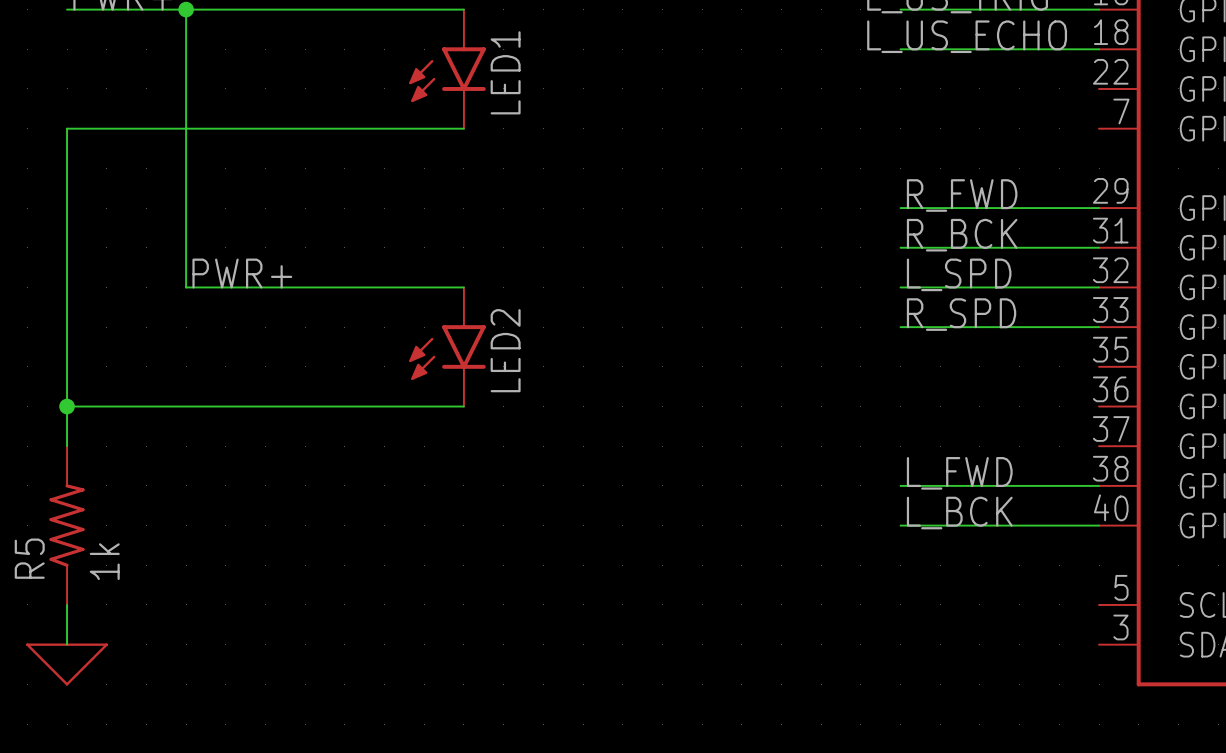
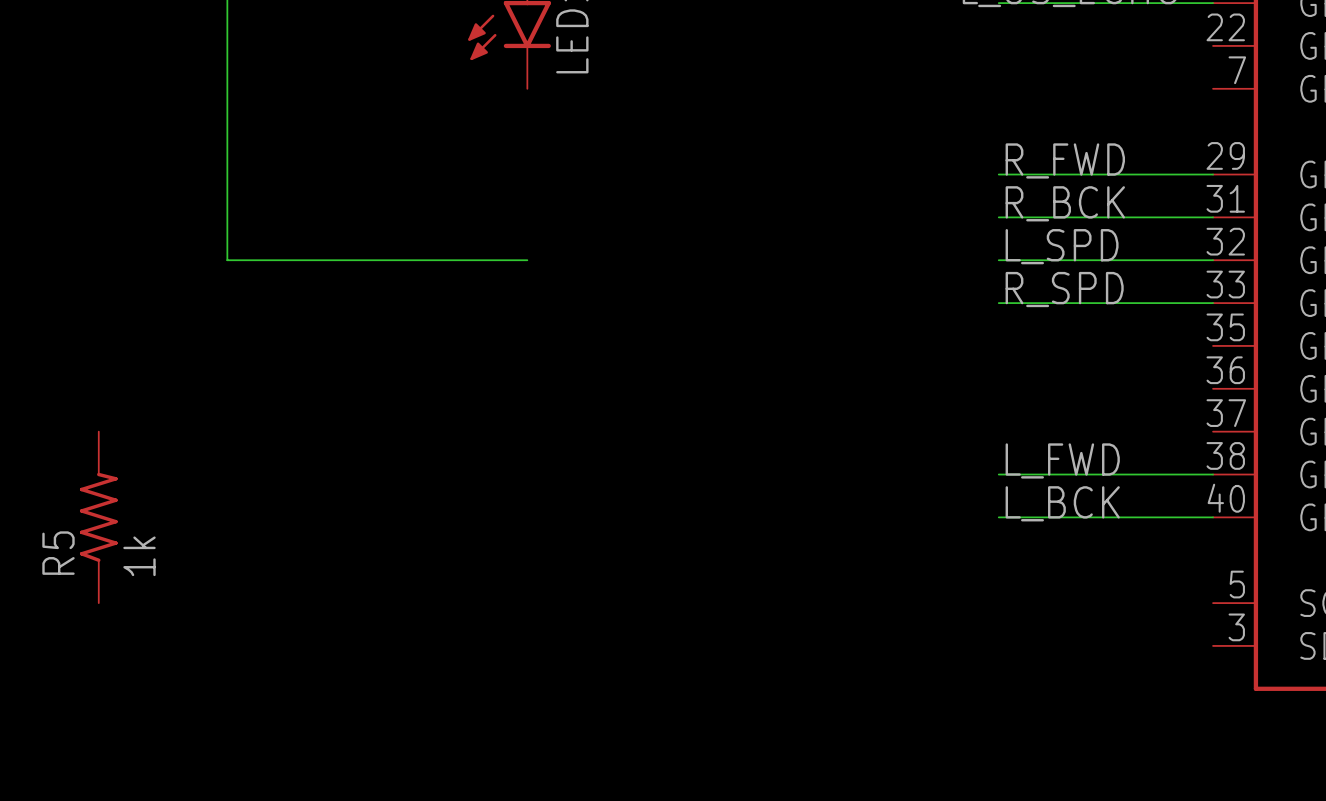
wire: (463, 128) (67, 128) (67, 446) -> none
label: PWR+ (242, 273) -> none
LED2: (447, 346) -> none
wire: (67, 406) (463, 406) -> none
junction: (67, 406) -> none
wire: (67, 604) (67, 644) -> none
power symbol: (67, 664) -> none

